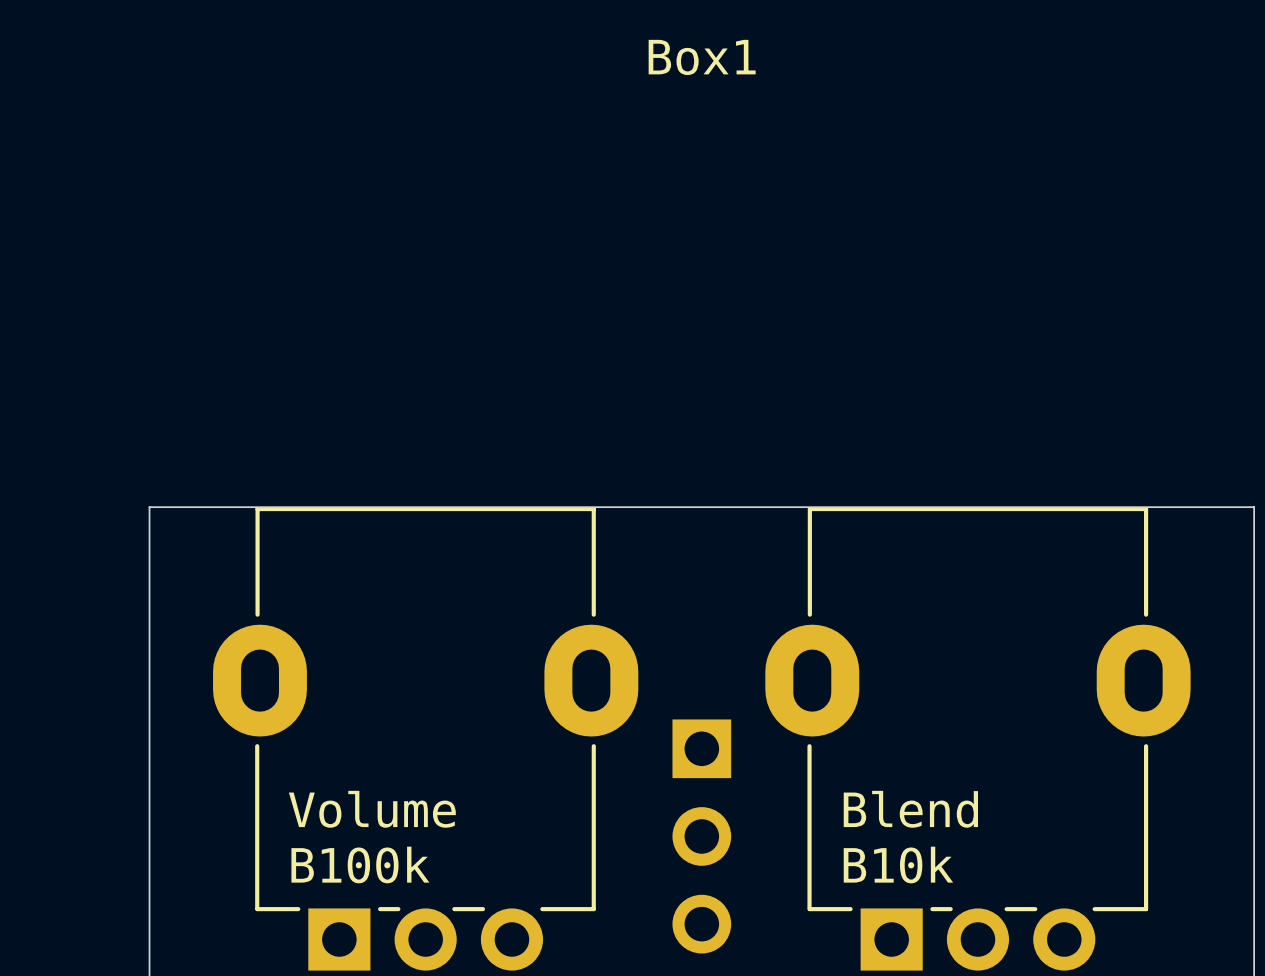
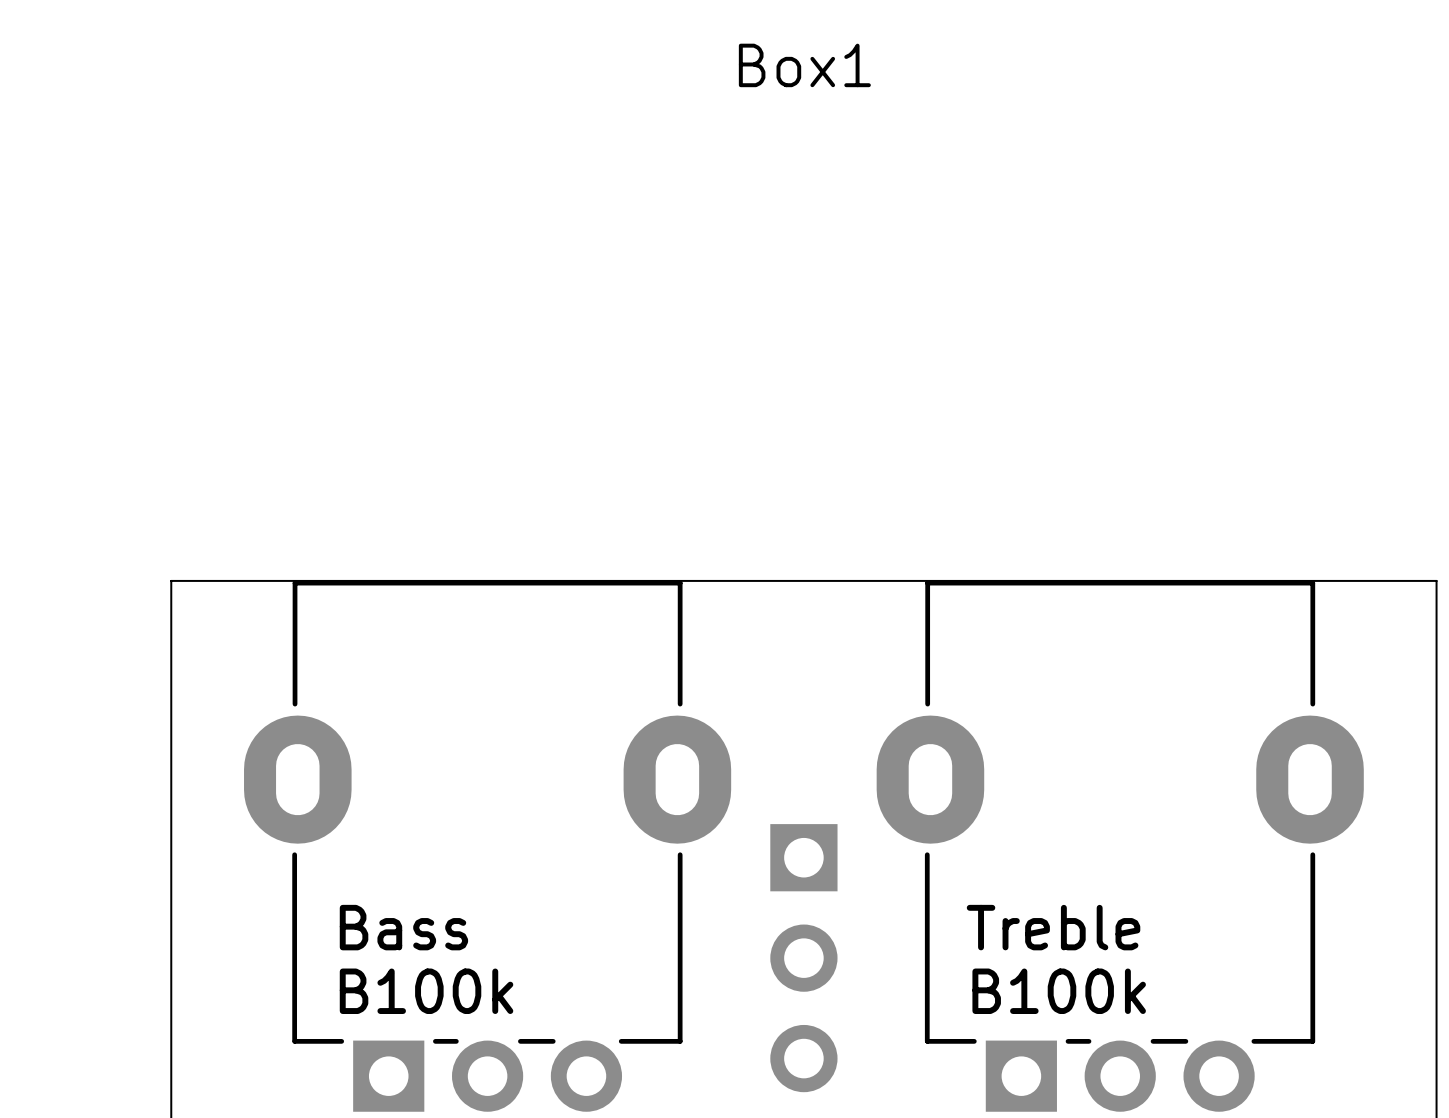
text: Volume (372, 809) -> Bass (403, 927)
text: Blend (910, 809) -> Treble (1053, 927)
text: B10k (898, 864) -> B100k (1059, 991)

